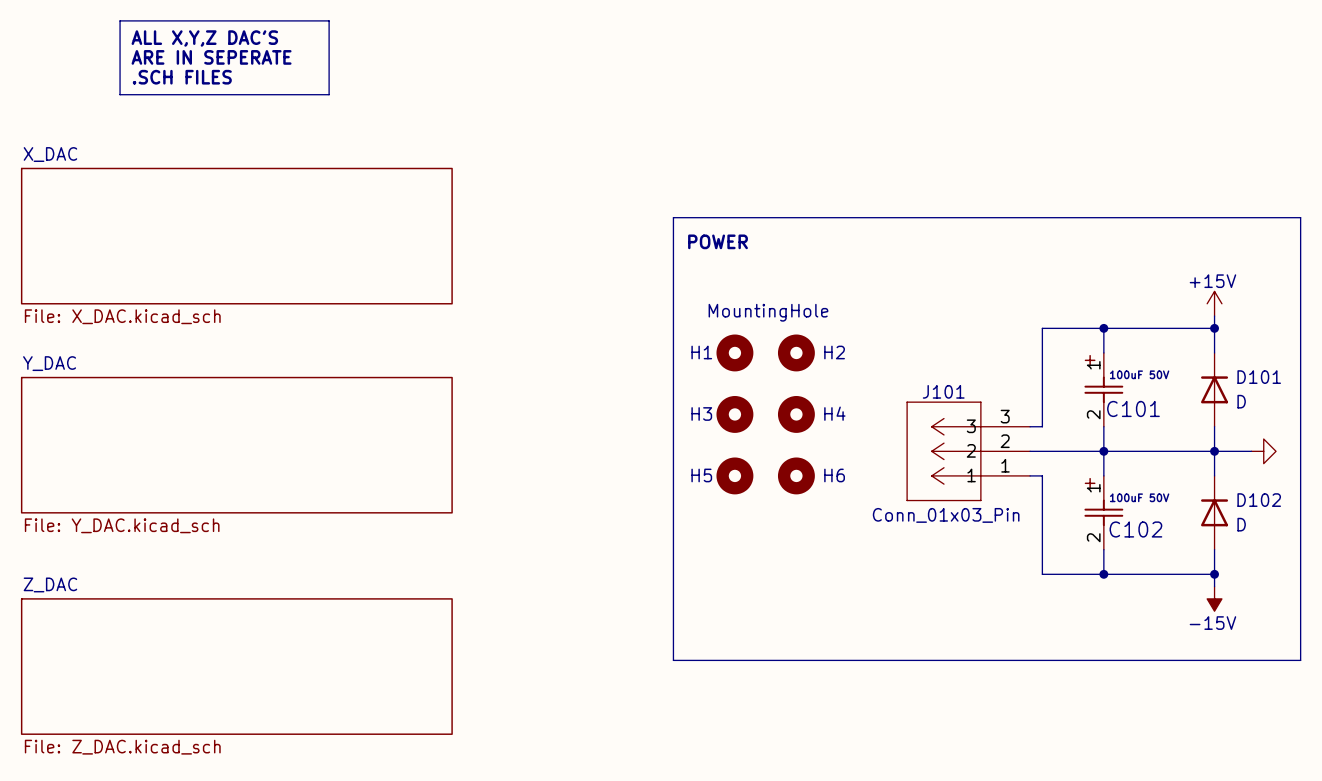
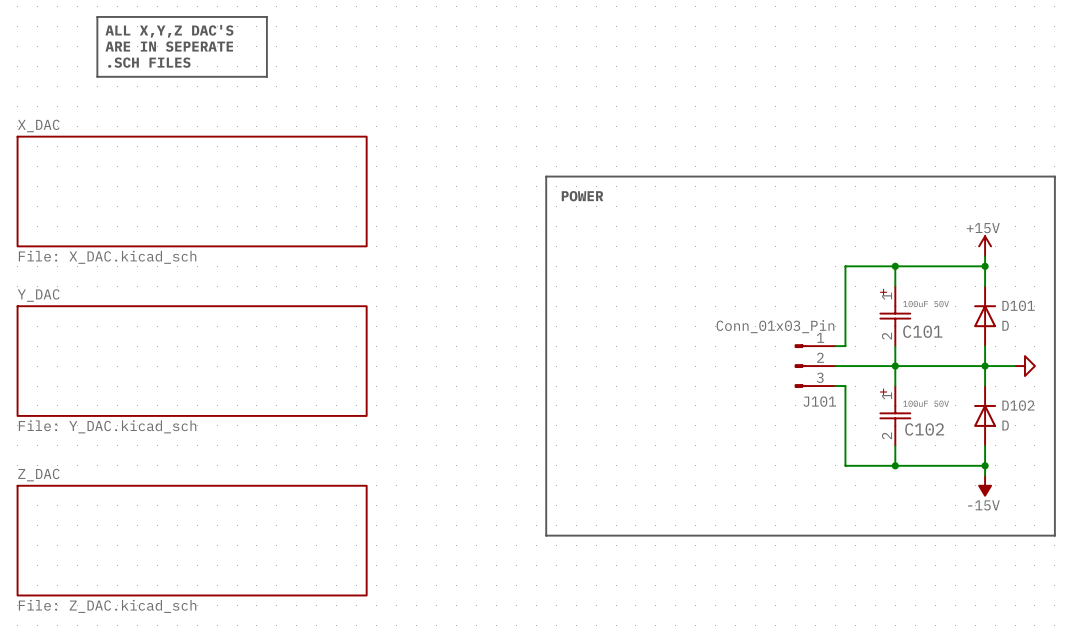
H1: MountingHole (734, 352) -> none
H2: (796, 352) -> none
J101 name position: J101 (943, 391) -> J101 (819, 401)
J101 symbol: [906, 401, 1031, 502] -> [794, 344, 836, 388]
H3: (734, 414) -> none
H4: (796, 414) -> none
H5: (734, 475) -> none
H6: (796, 475) -> none
J101 value position: Conn_01x03_Pin (946, 515) -> Conn_01x03_Pin (775, 326)

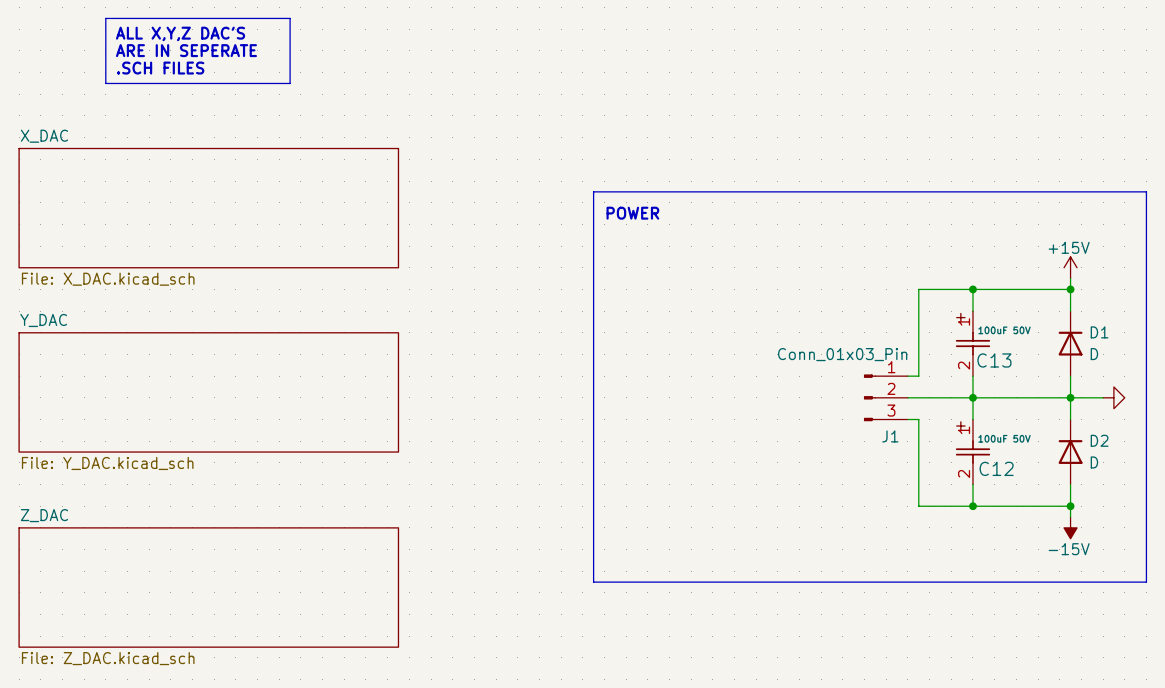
D101 name: D101 (1018, 305) -> D1 (1099, 332)
C101 name: C101 (922, 331) -> C13 (994, 360)
J101 name: J101 (819, 401) -> J1 (890, 436)
D102 name: D102 (1018, 405) -> D2 (1099, 440)
C102 name: C102 (924, 429) -> C12 (996, 468)

